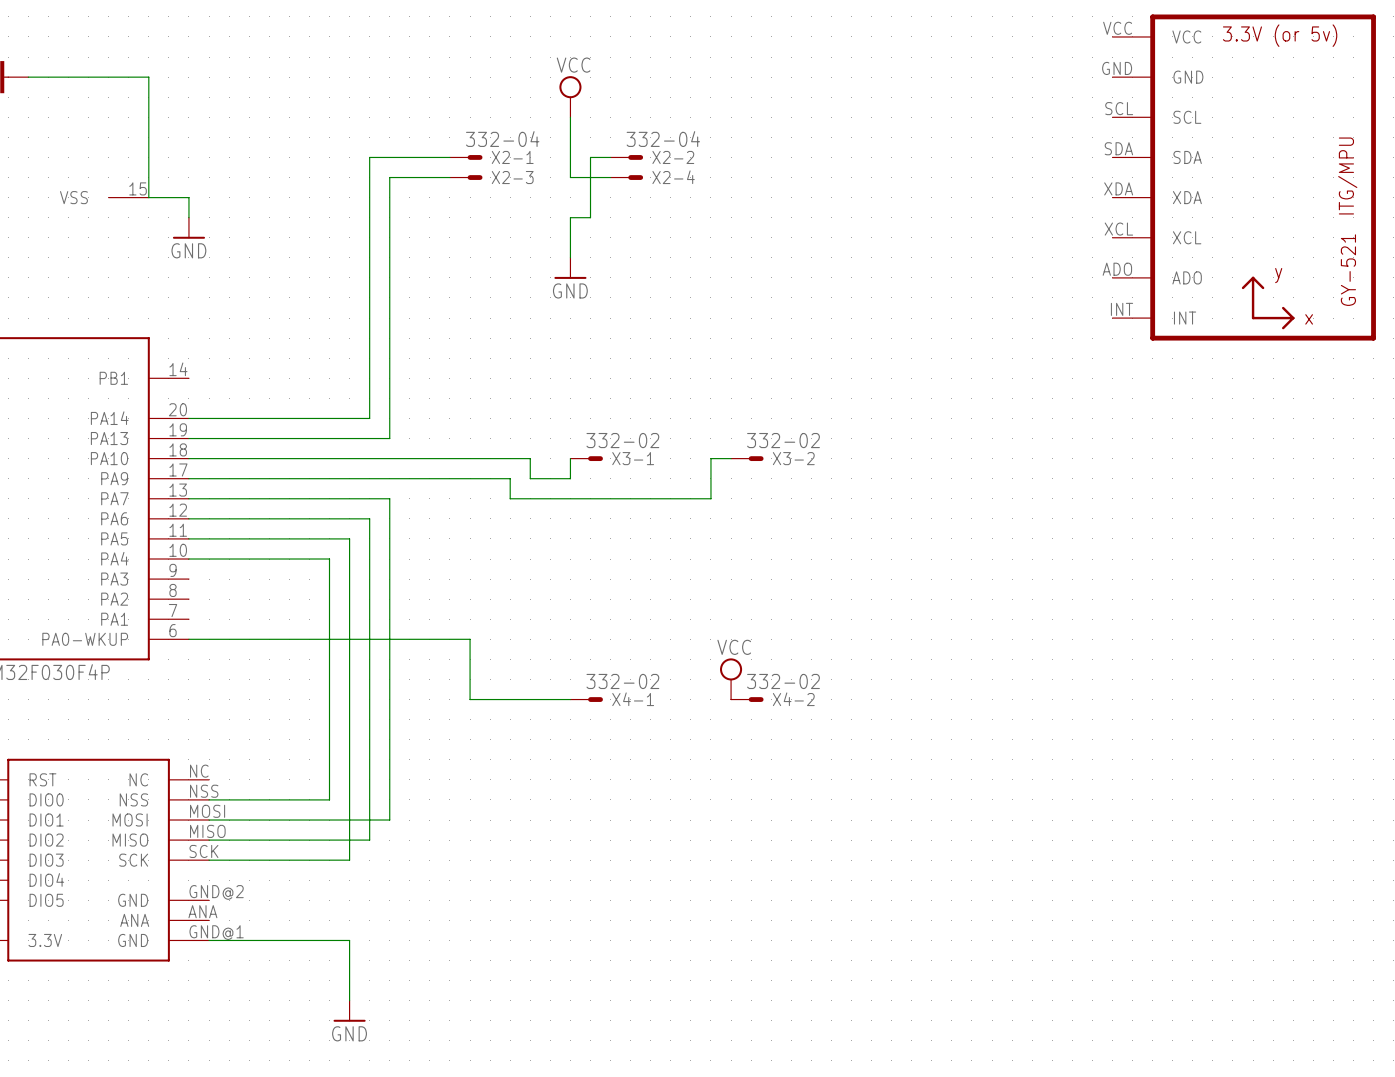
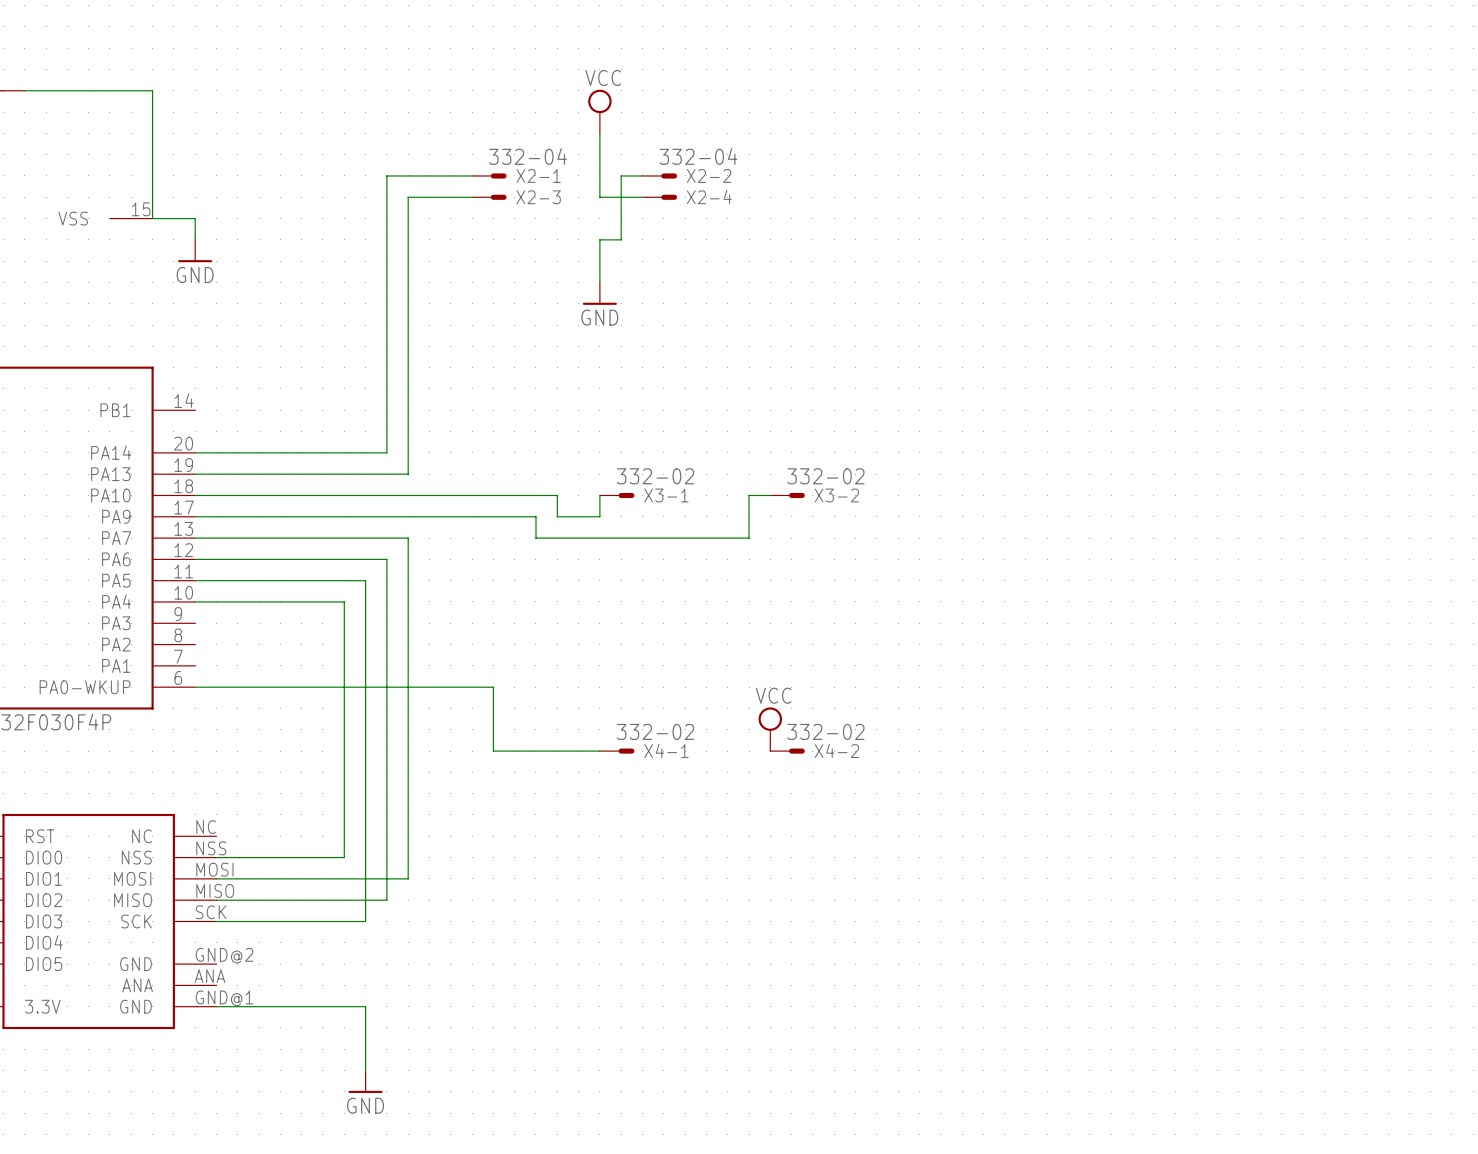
part: (1244, 177) -> none

